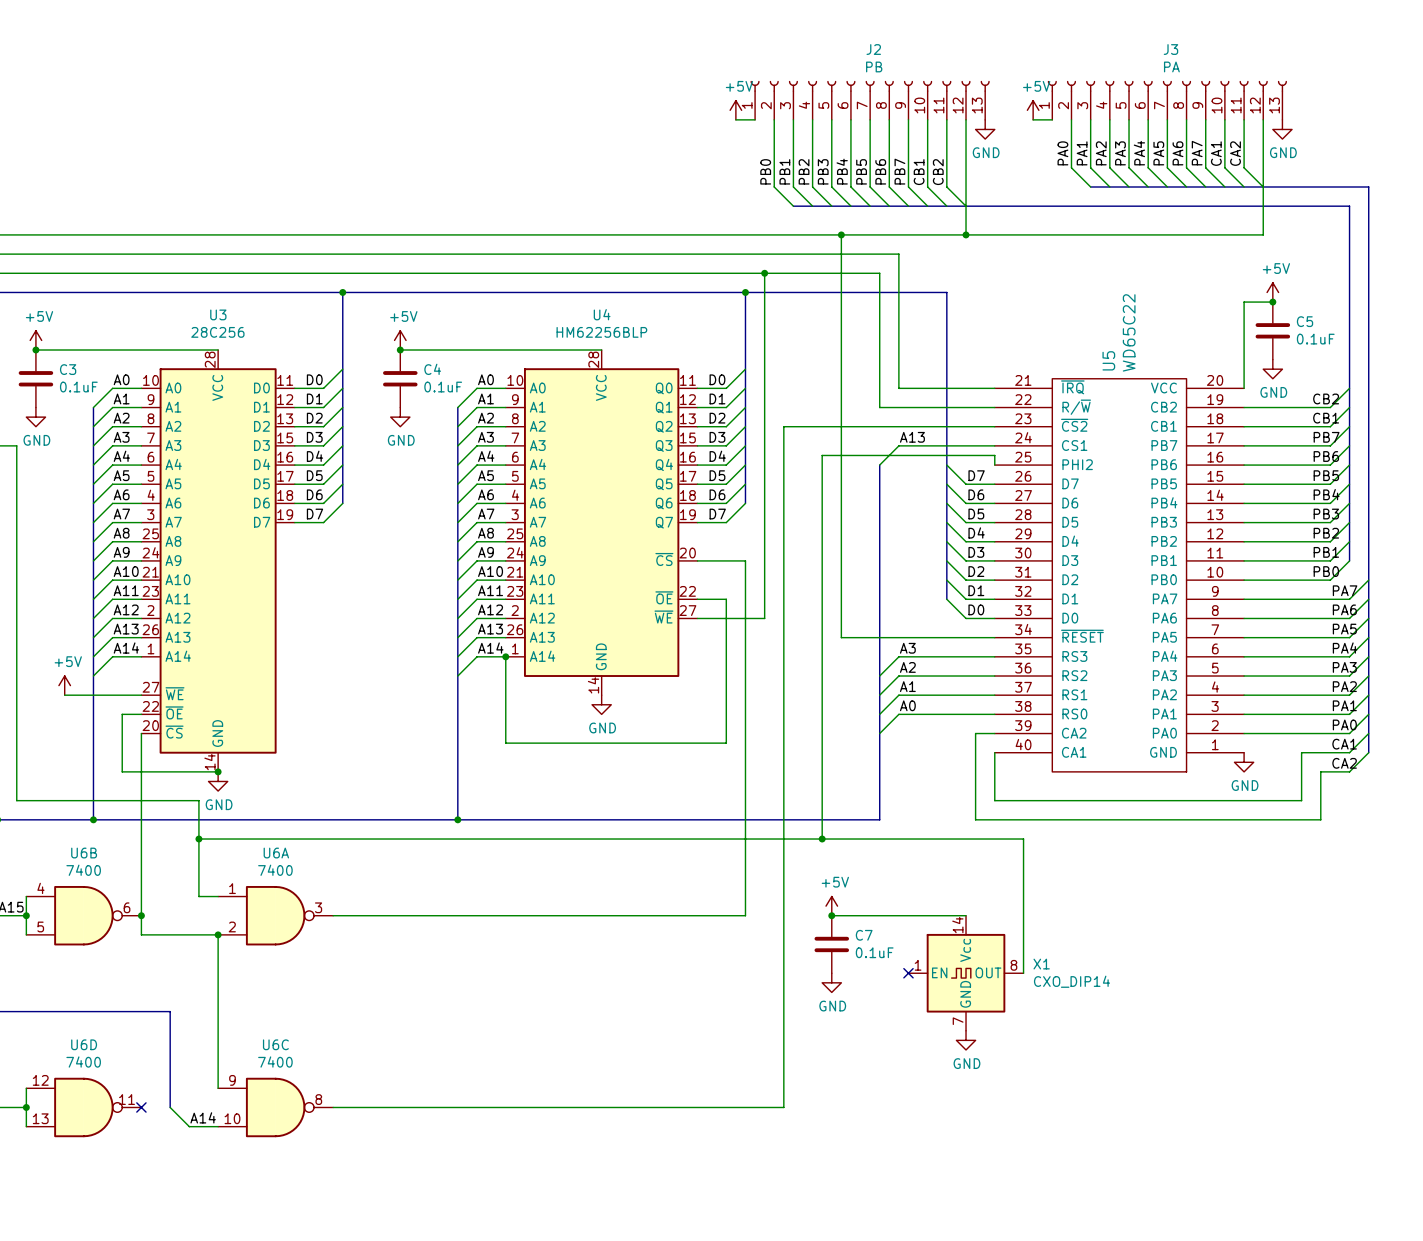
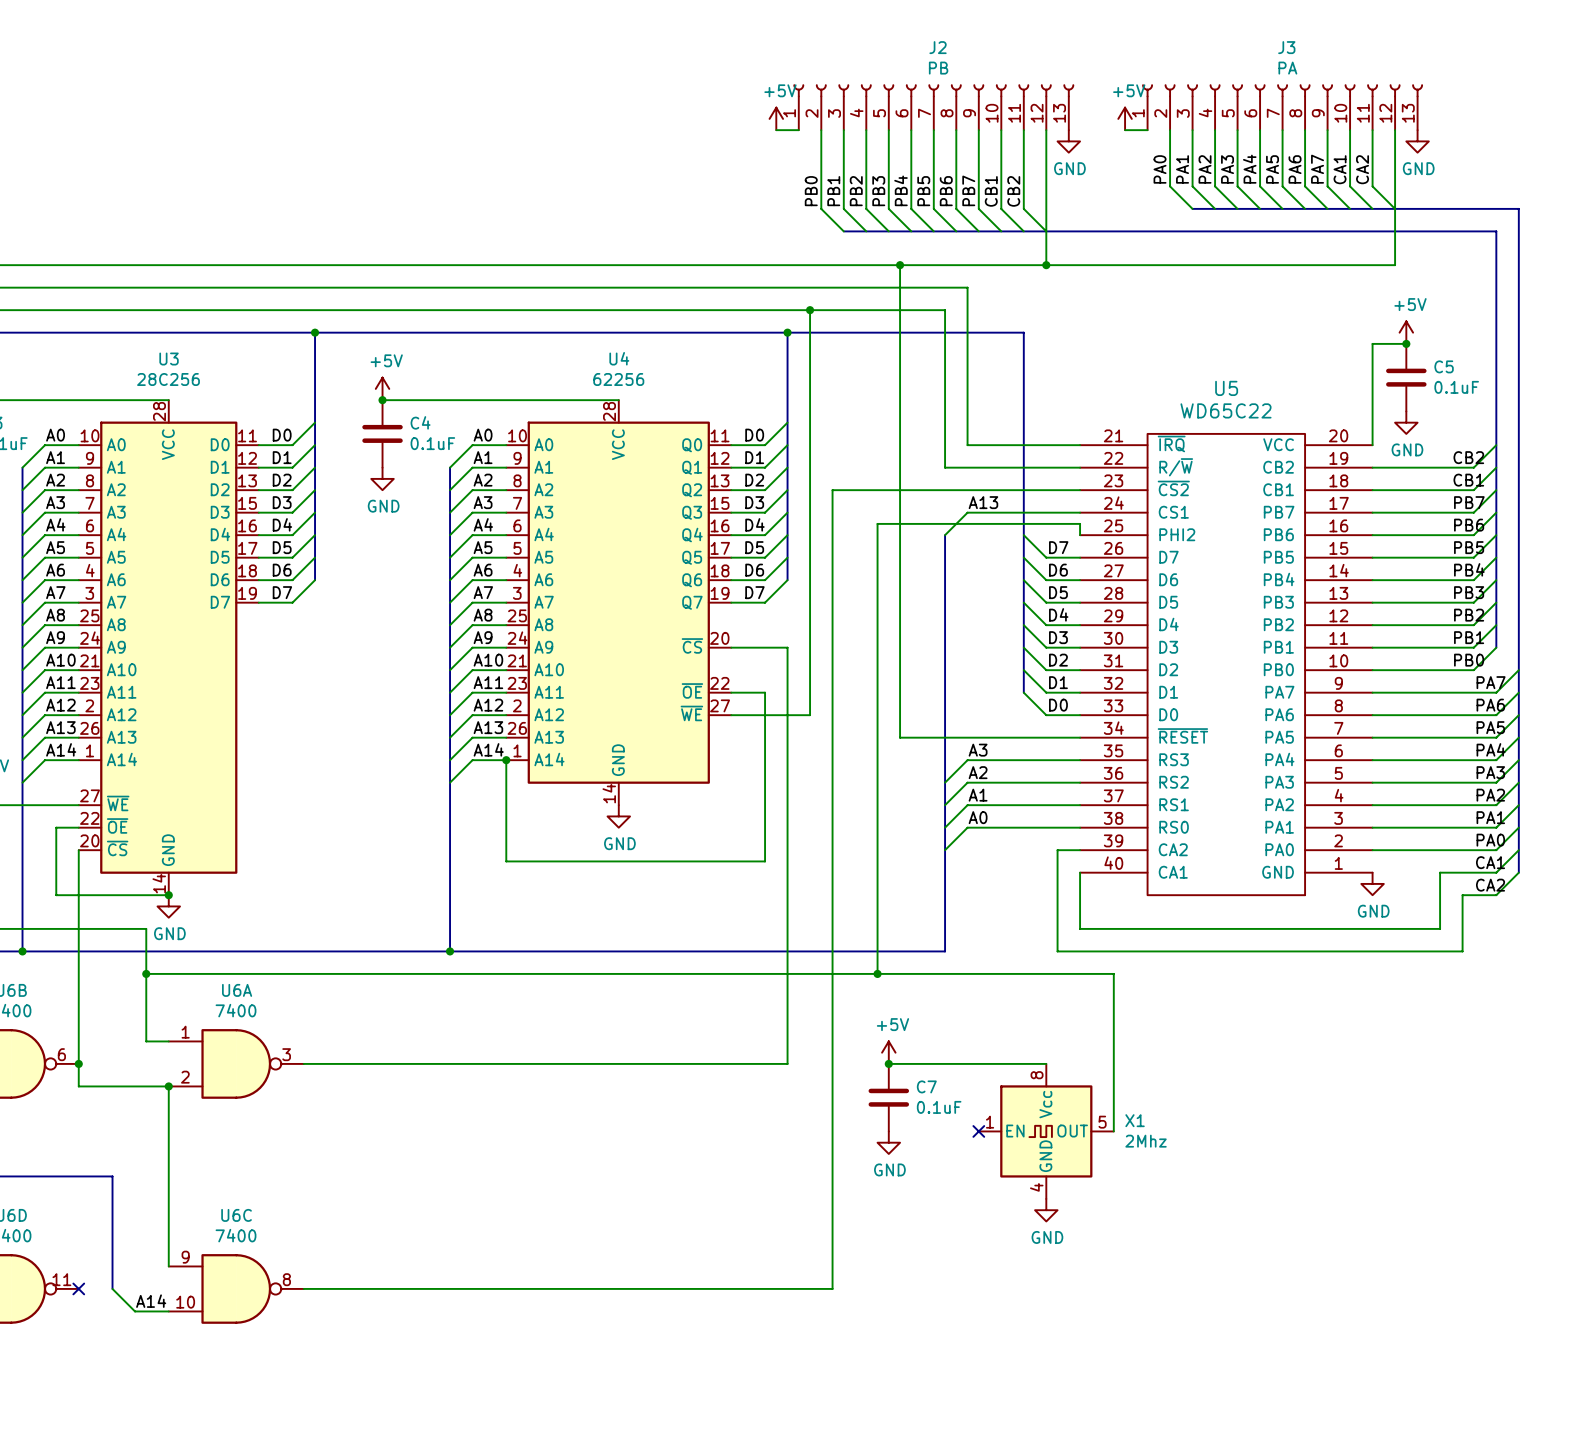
U4 value: HM62256BLP (601, 332) -> 62256 (618, 379)
U5 value rotation: 0° (1129, 332) -> 90° clockwise (1225, 410)
U5 name rotation: 0° (1108, 360) -> 90° clockwise (1226, 388)
X1 pin number: 14 (957, 925) -> 8 (1037, 1075)
X1 pin number: 8 (1013, 965) -> 5 (1102, 1122)
X1 value: CXO_DIP14 (1072, 981) -> 2Mhz (1146, 1141)
X1 pin number: 7 (958, 1021) -> 4 (1036, 1187)

